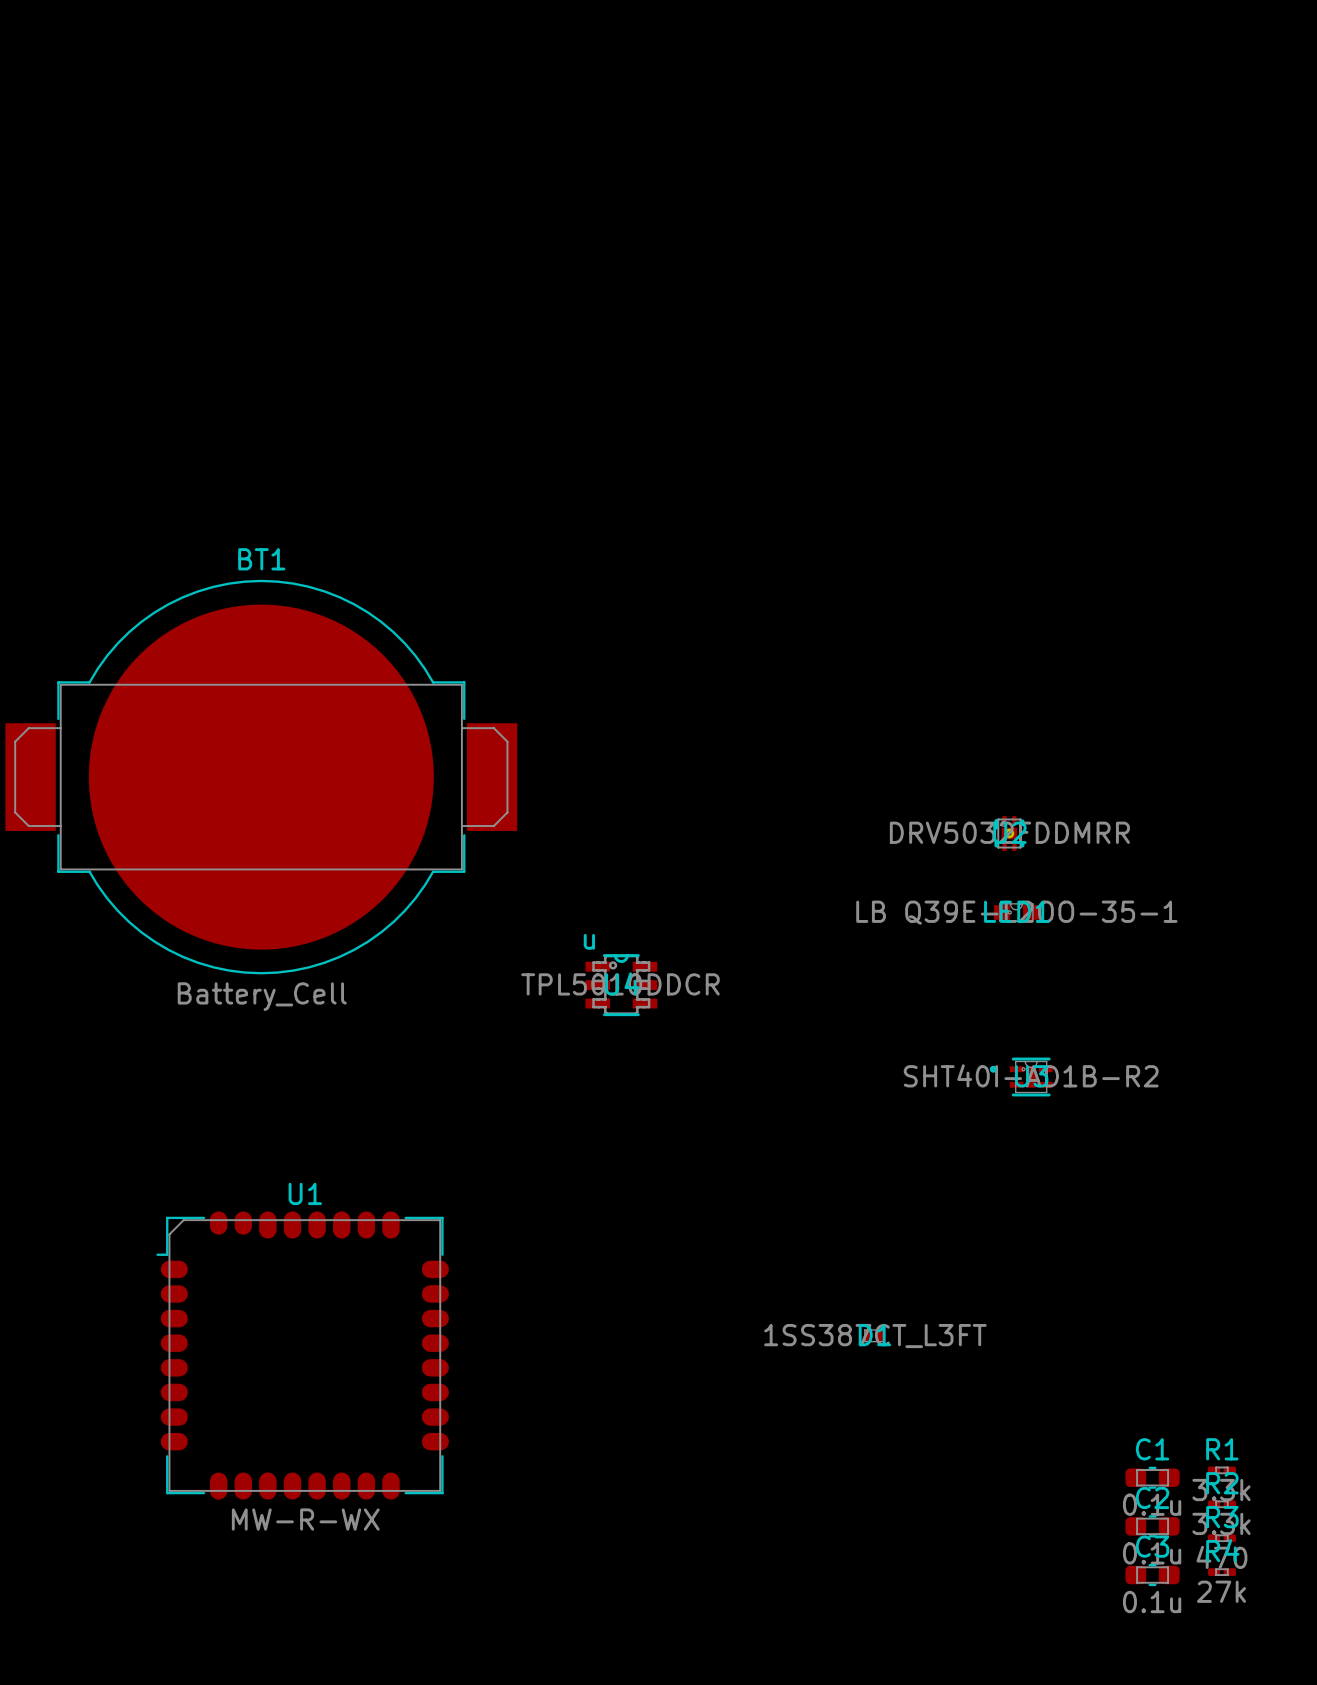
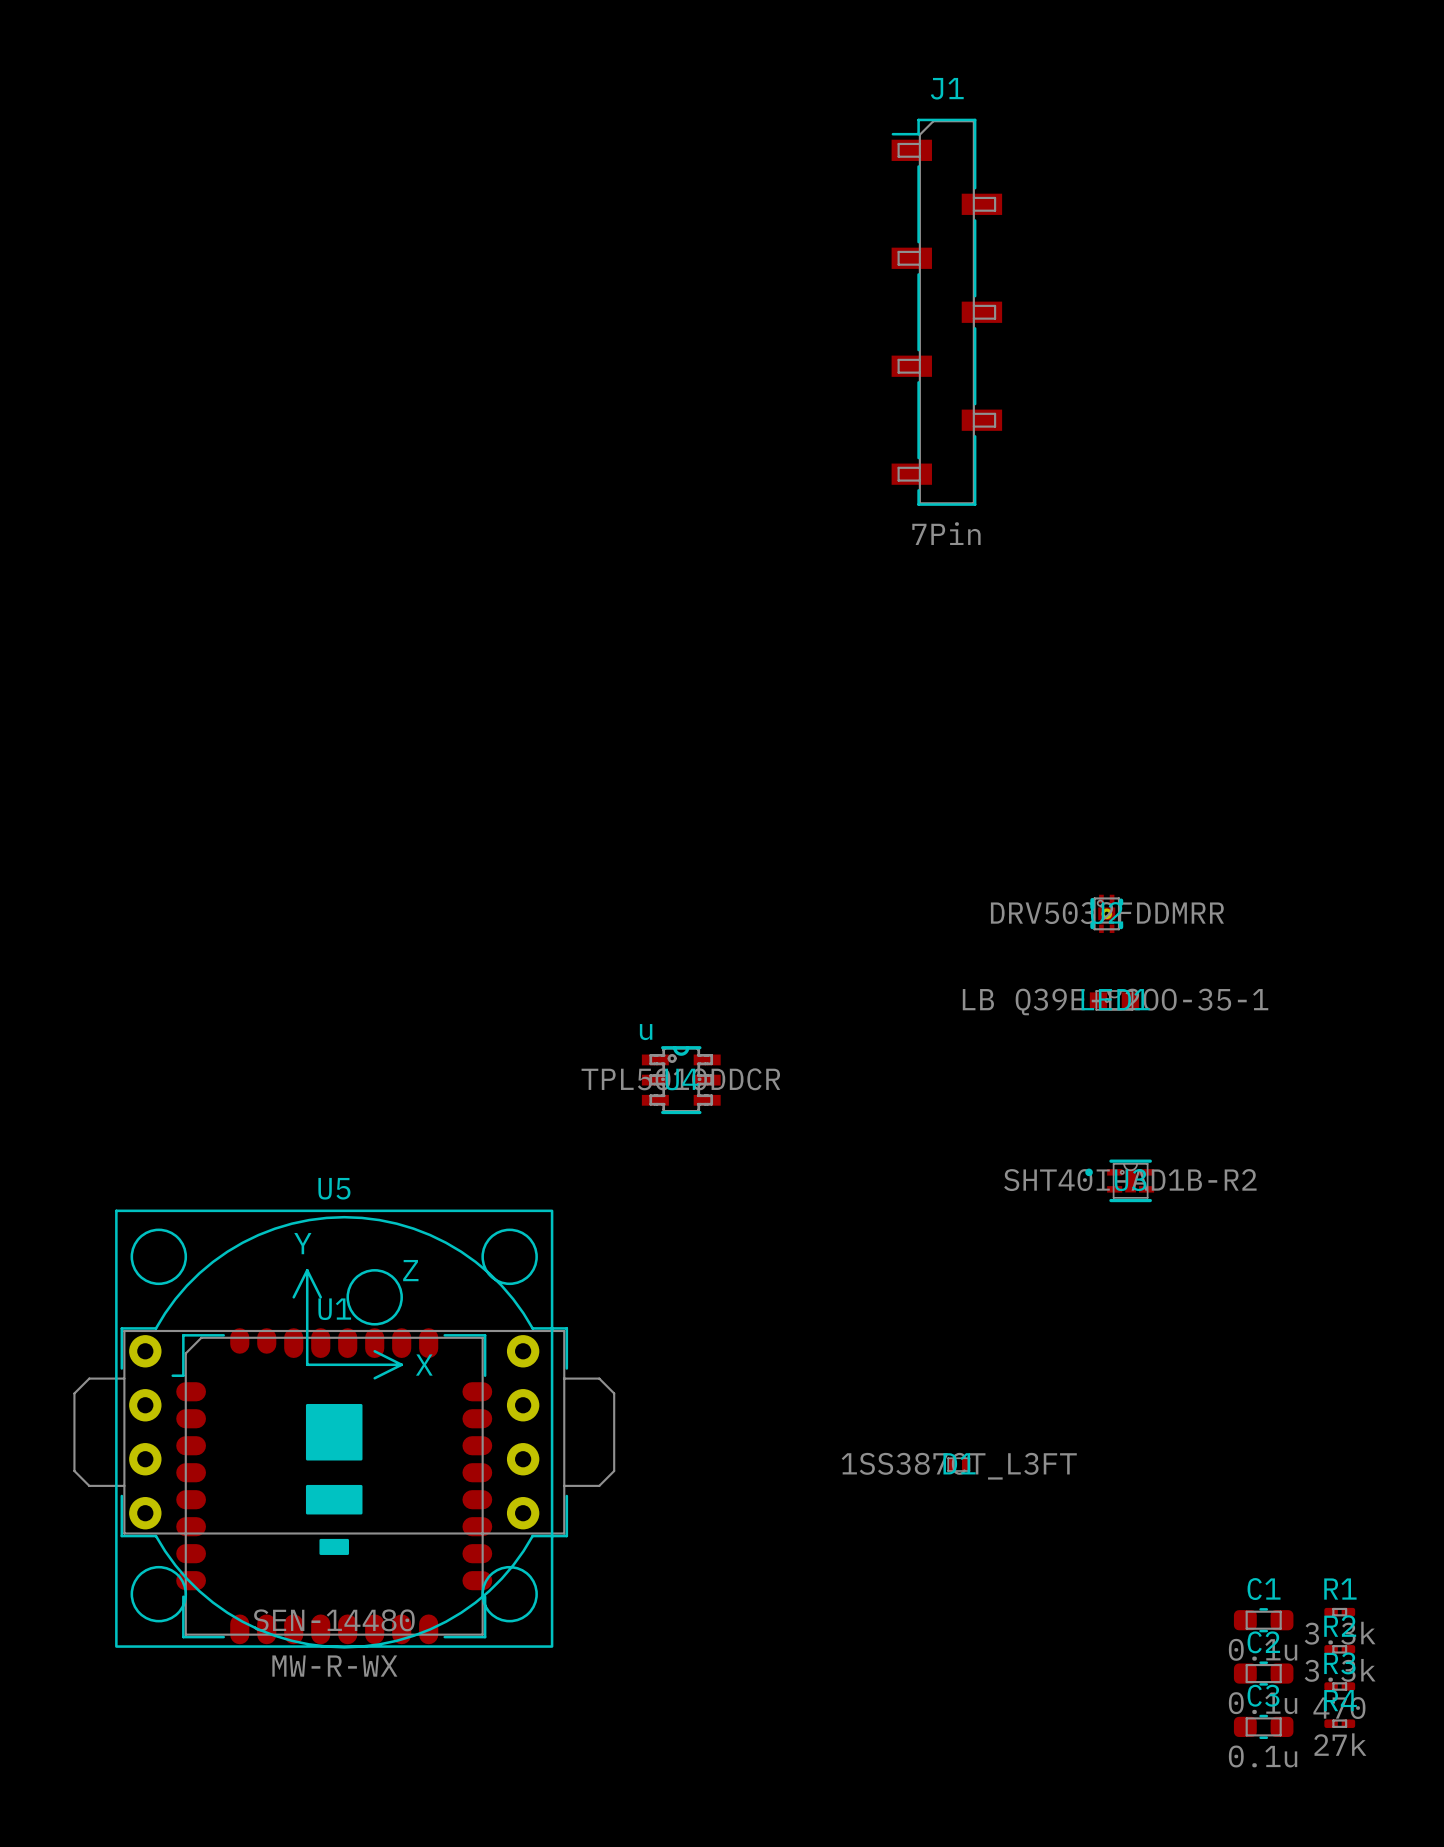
J1: none -> 7Pin (946, 312)
BT1: Battery_Cell (261, 777) -> none
U5: none -> SEN-14480 (334, 1428)
part: none -> (344, 1432)

